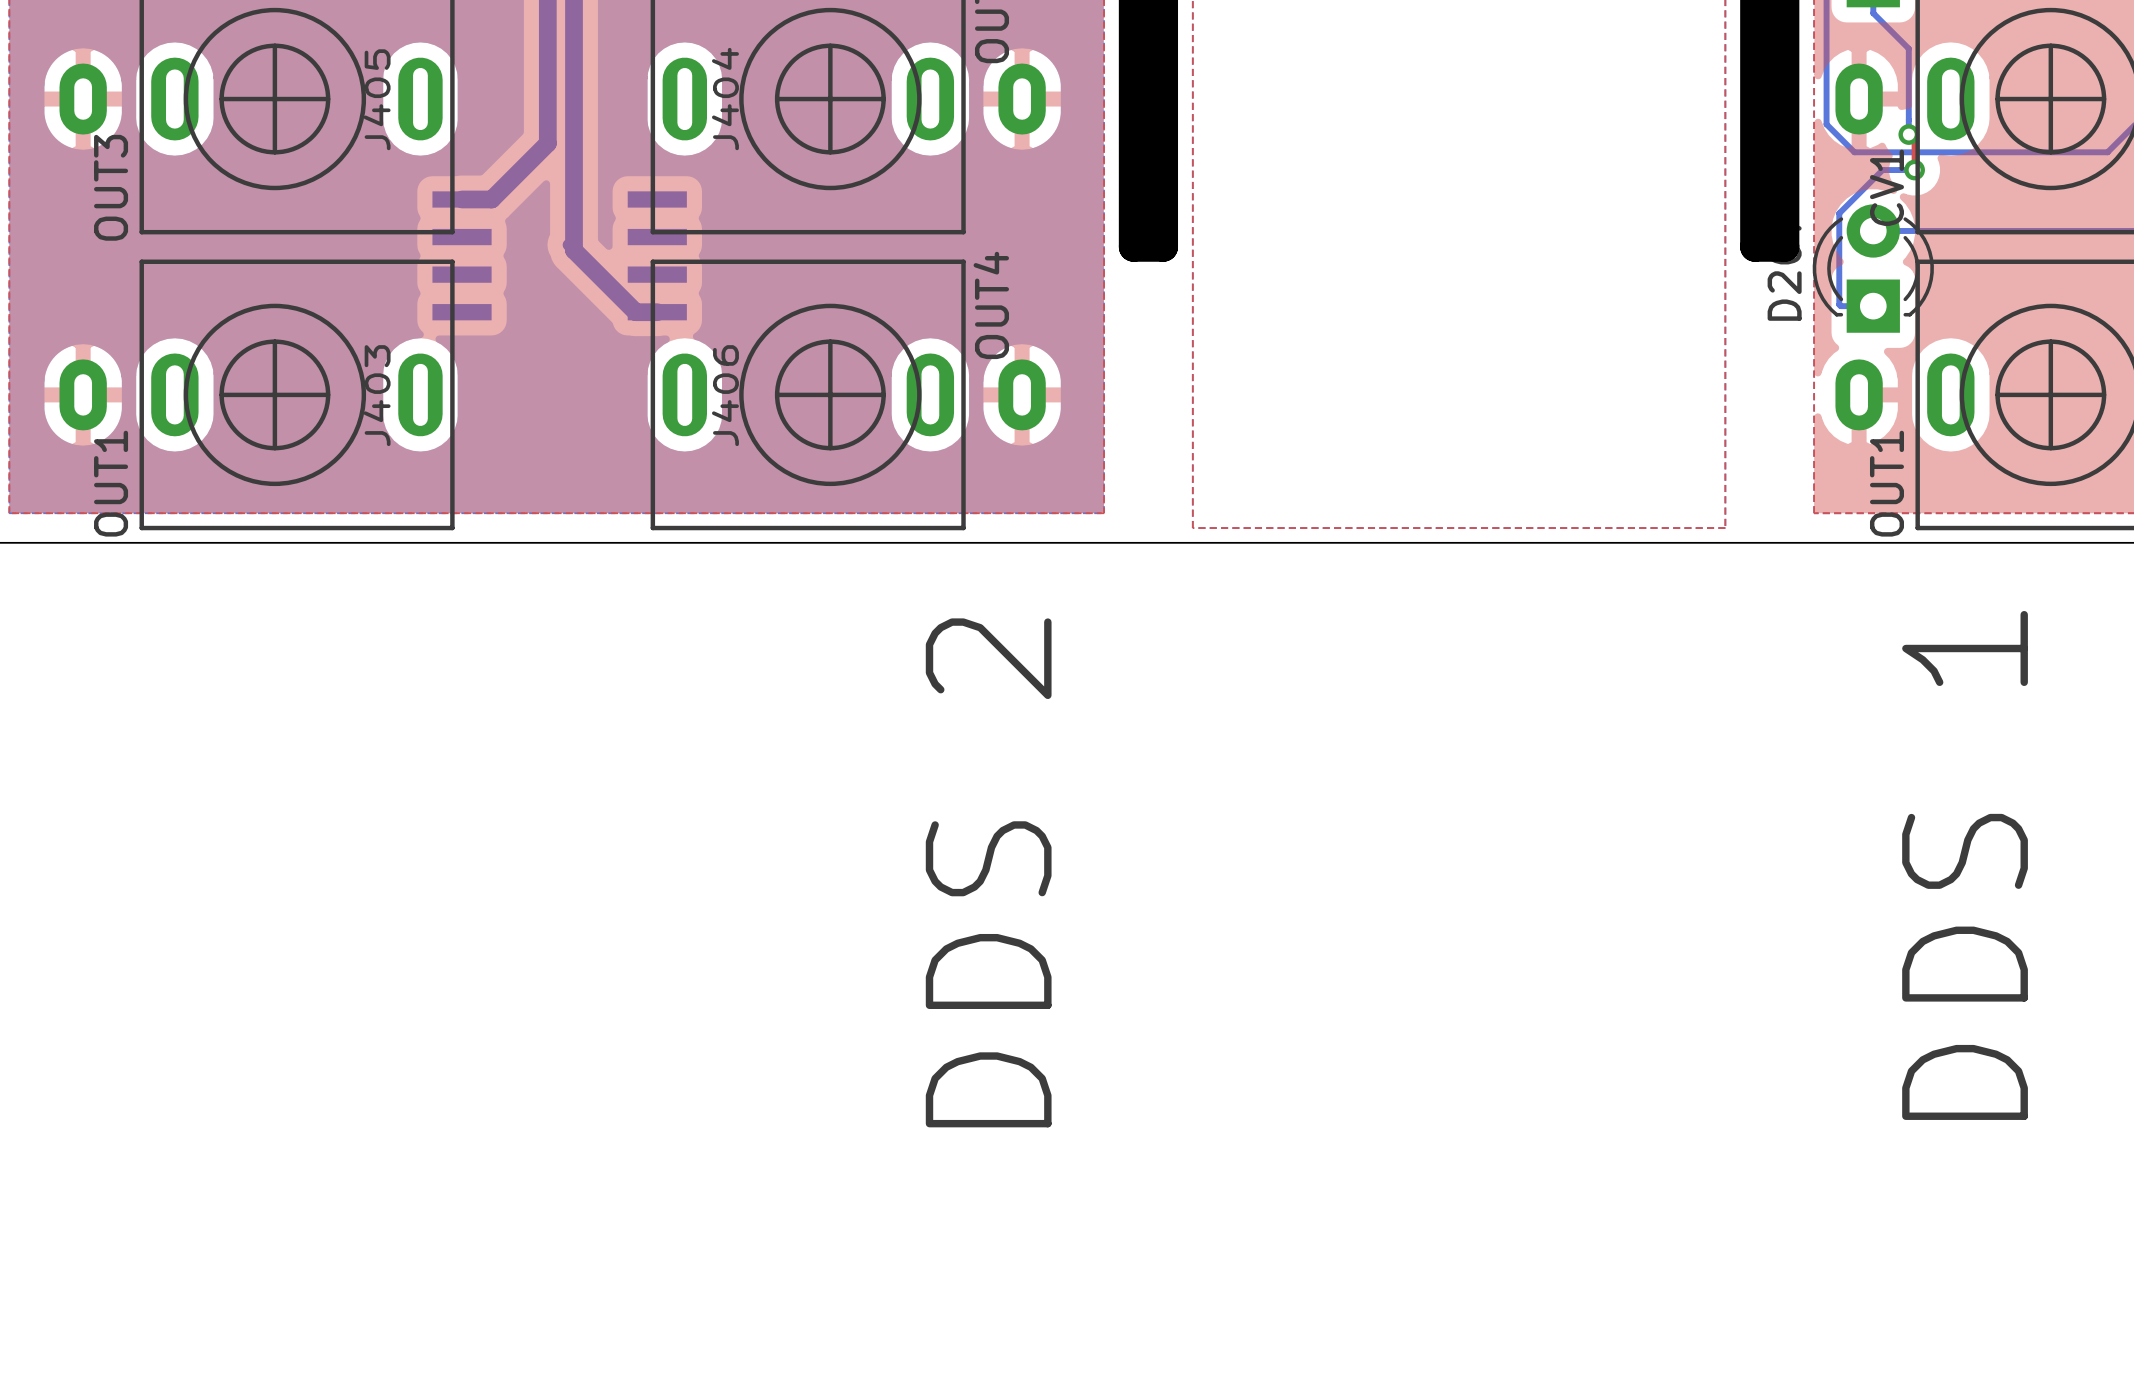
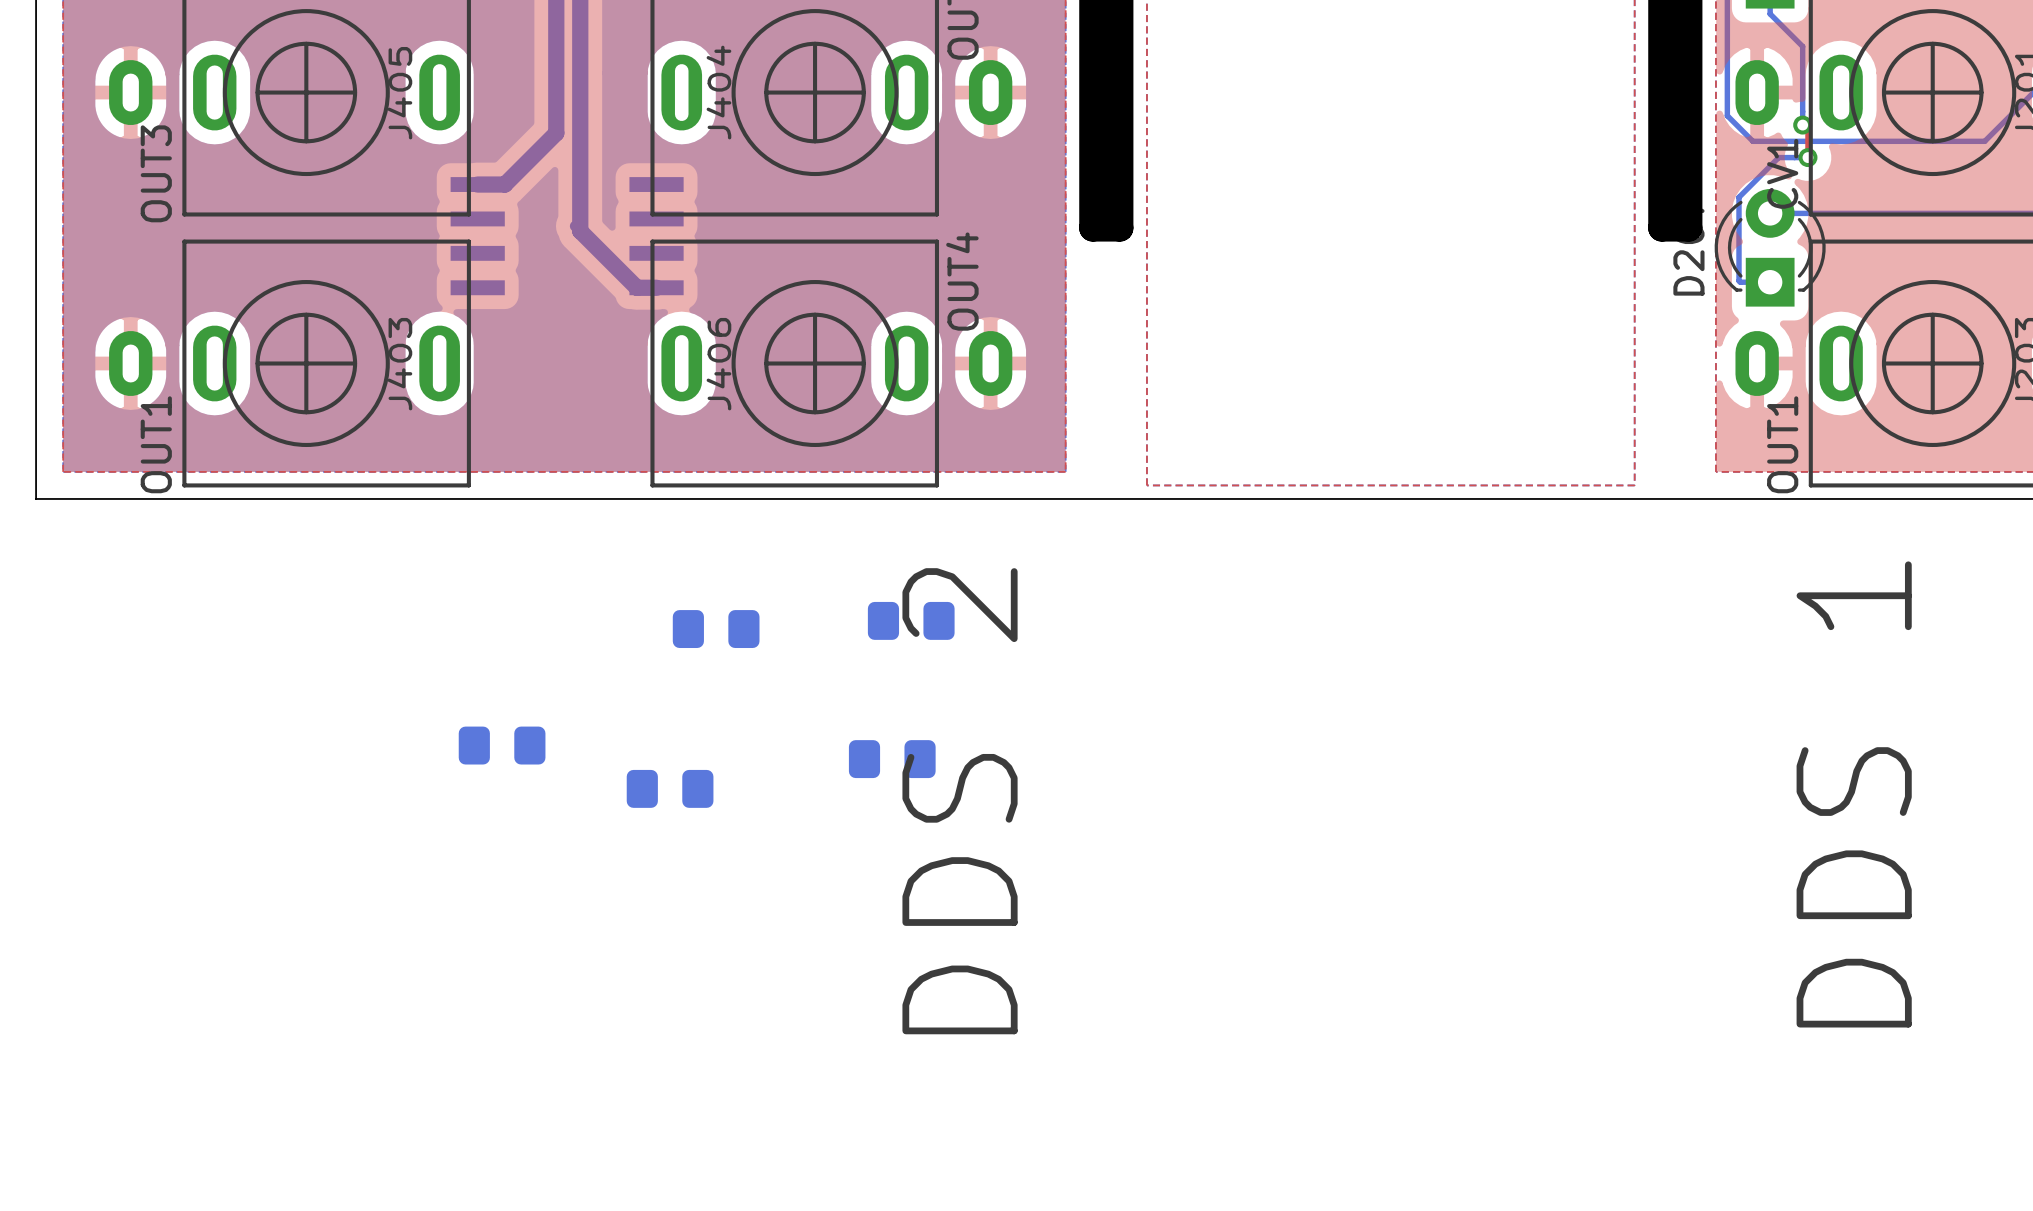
part: none -> (911, 620)
part: none -> (716, 629)
part: none -> (502, 745)
part: none -> (892, 759)
part: none -> (670, 788)

